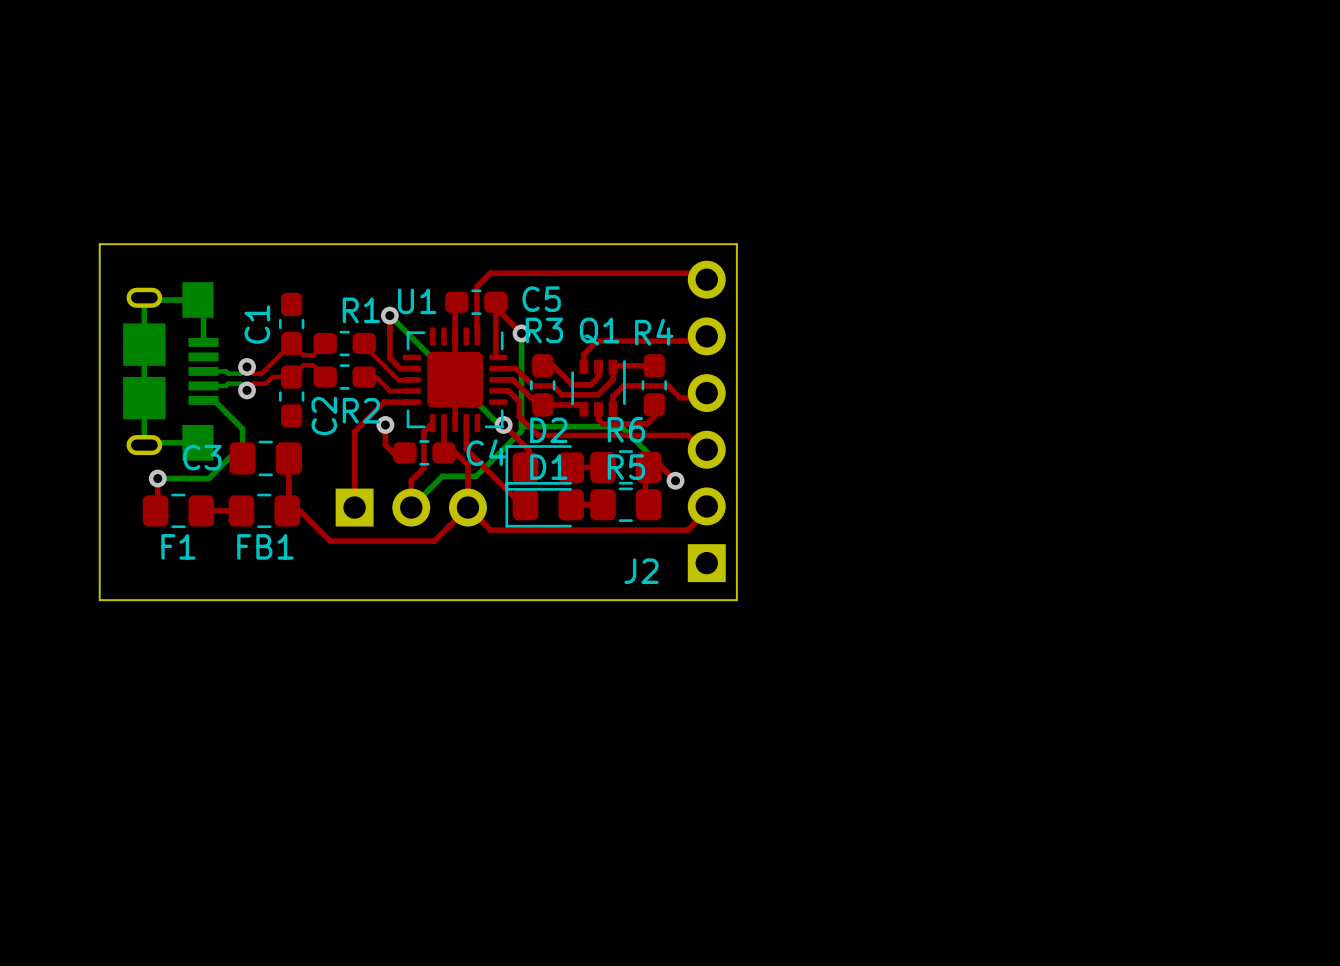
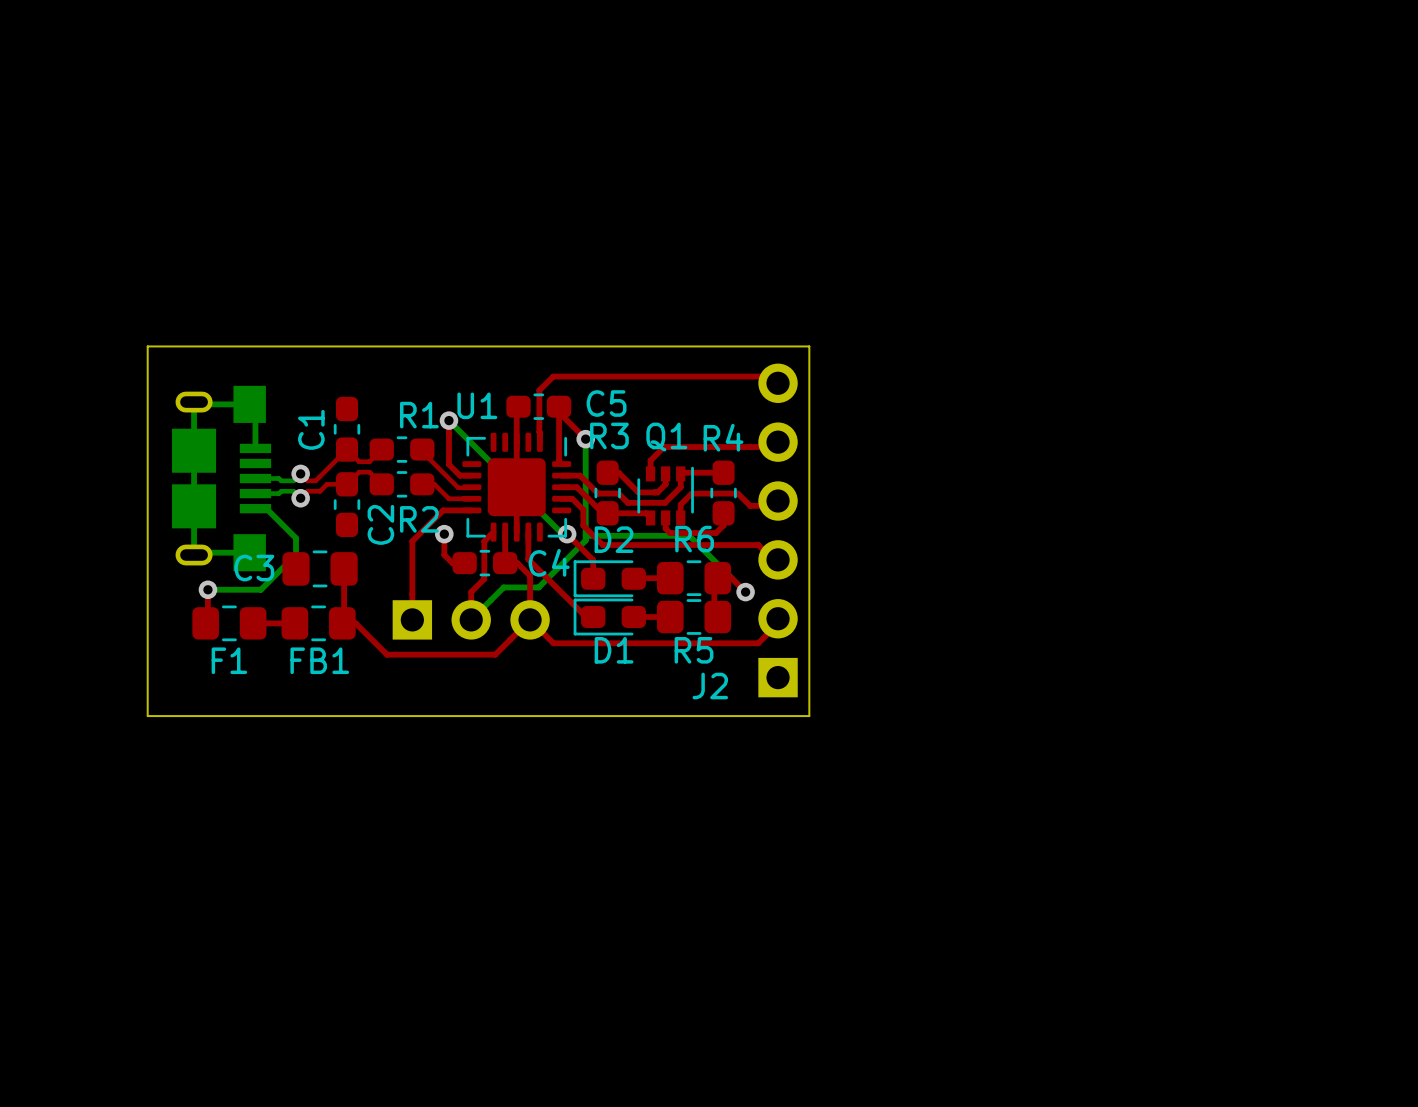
D2 footprint: [505, 445, 585, 491] -> [573, 560, 646, 598]
D1 name position: D1 (548, 467) -> D1 (614, 650)
R5 name position: R5 (626, 467) -> R5 (694, 650)
D1 footprint: [505, 481, 585, 528] -> [573, 598, 646, 636]

